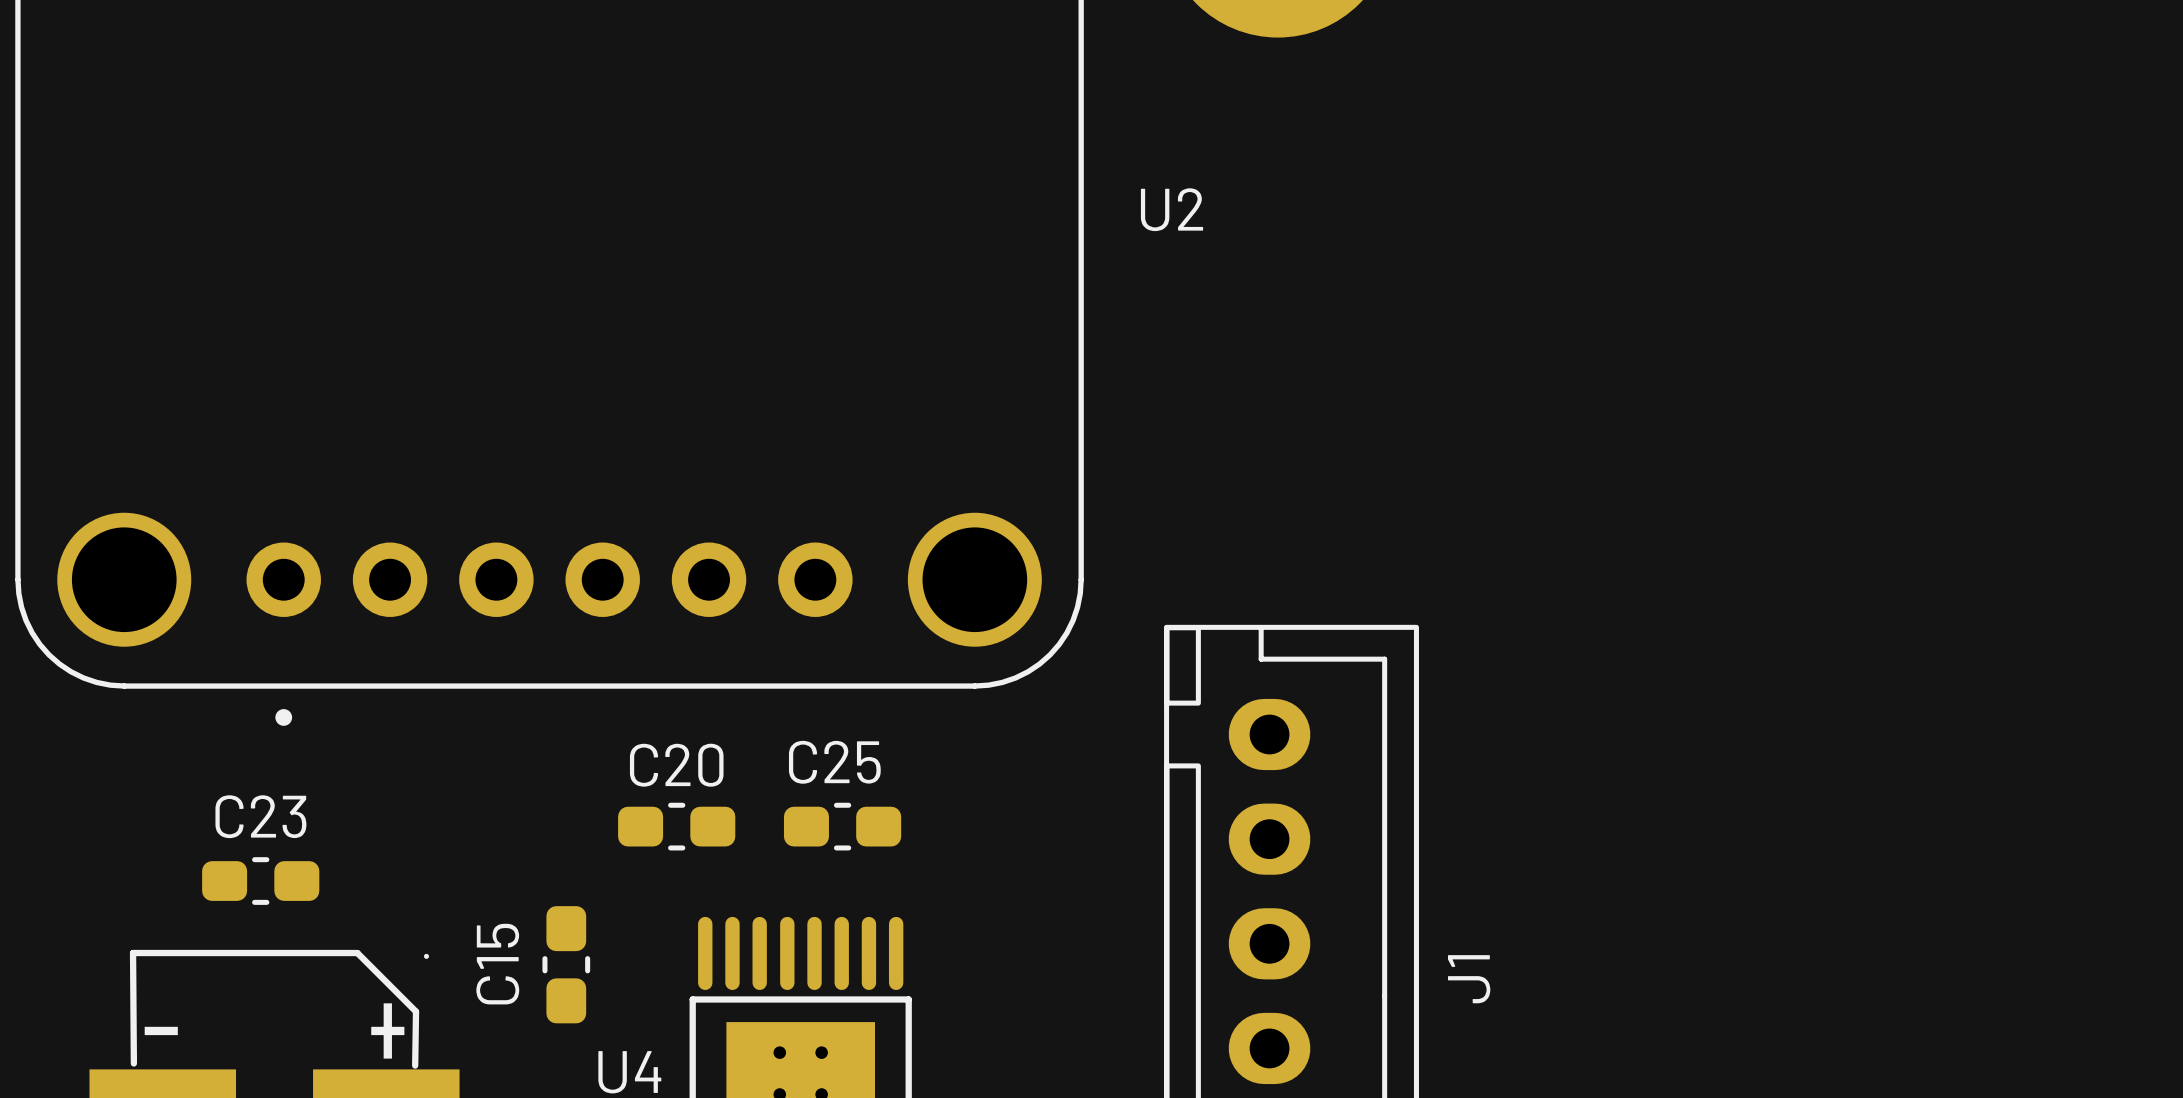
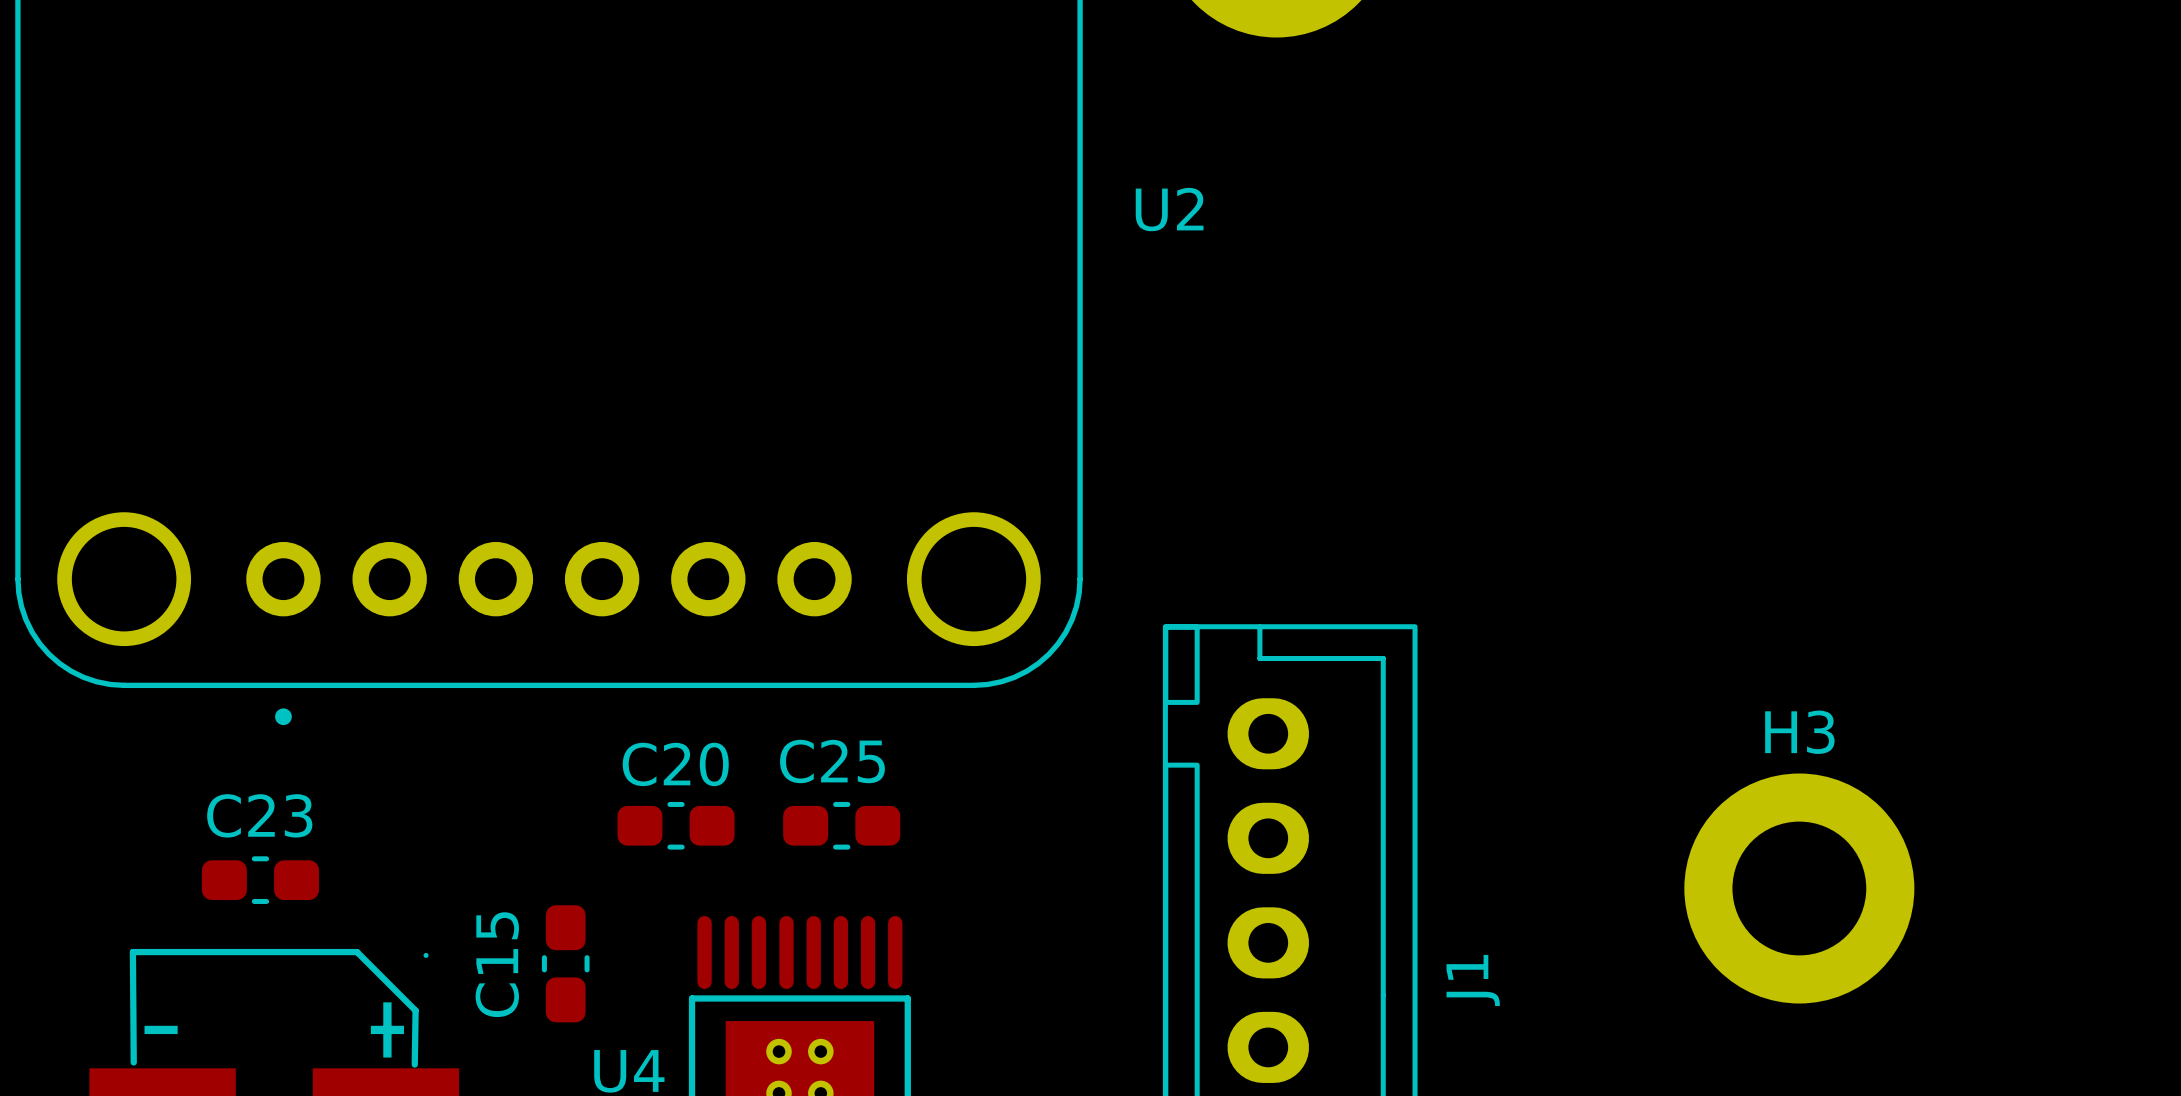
H3: none -> (1799, 888)

